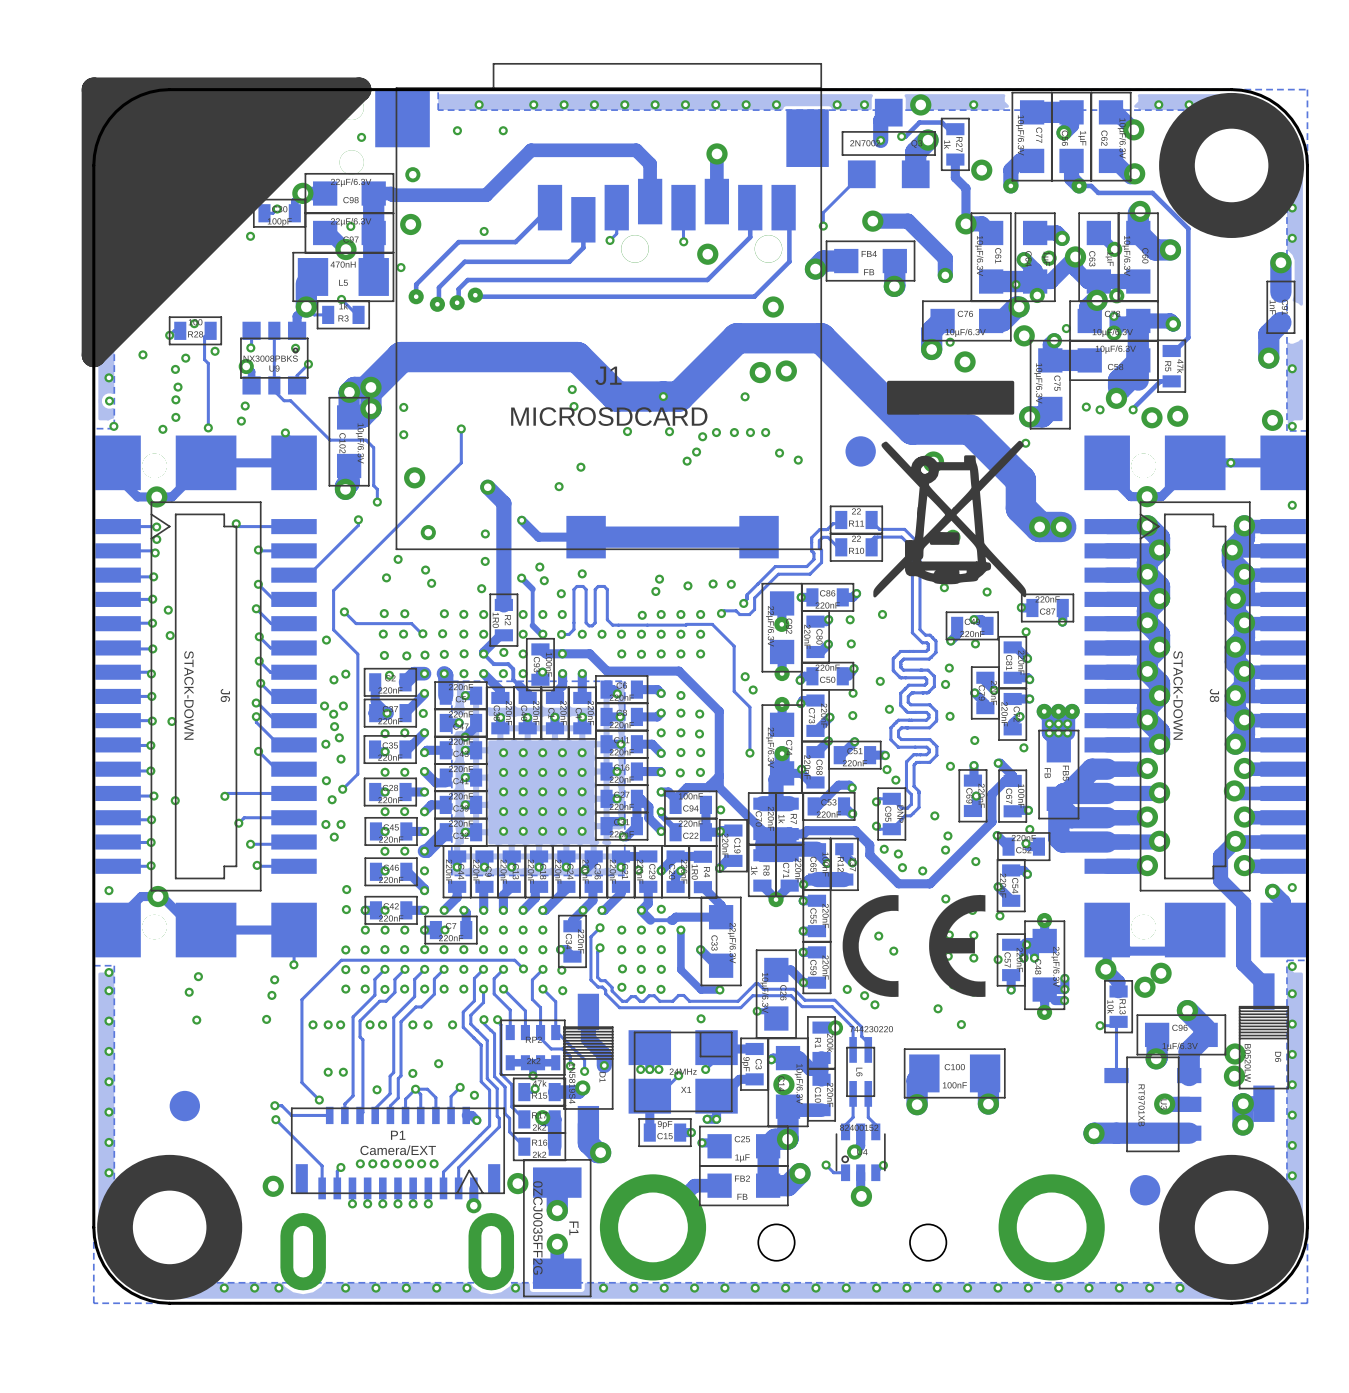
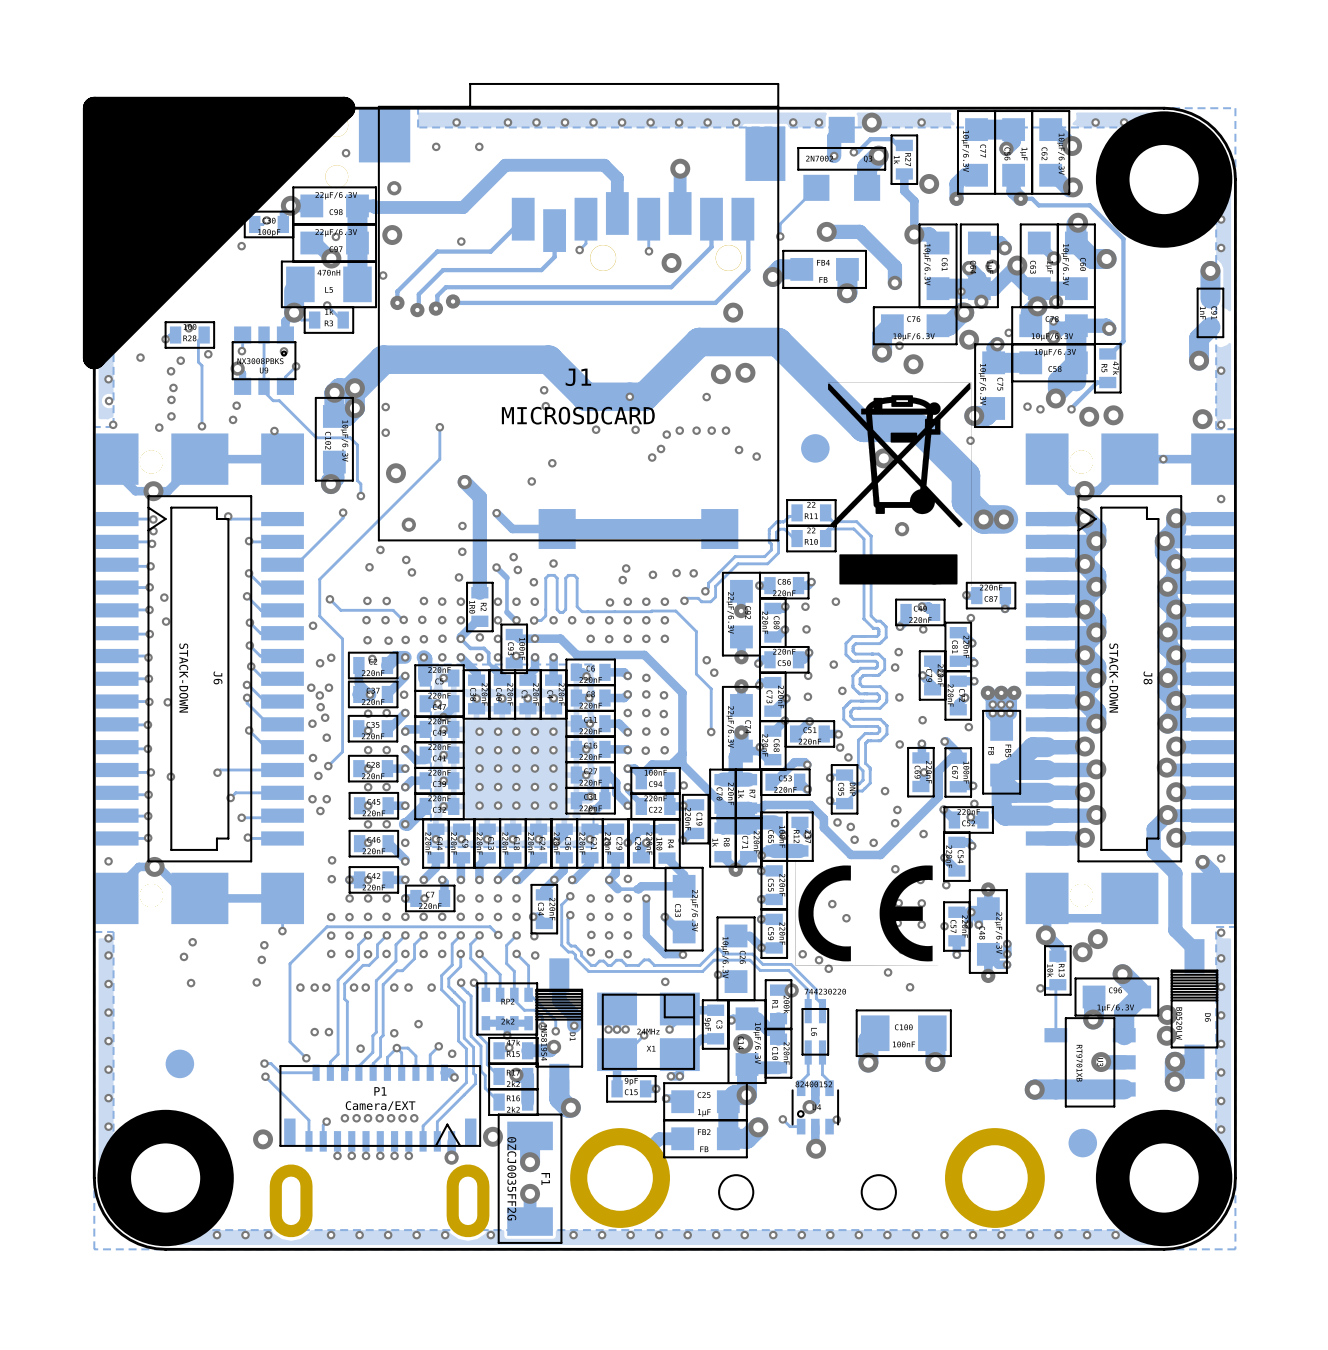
drawing shape: [873, 380, 1027, 598] -> [827, 382, 972, 586]
drawing shape: [842, 894, 986, 997] -> [795, 861, 939, 966]

